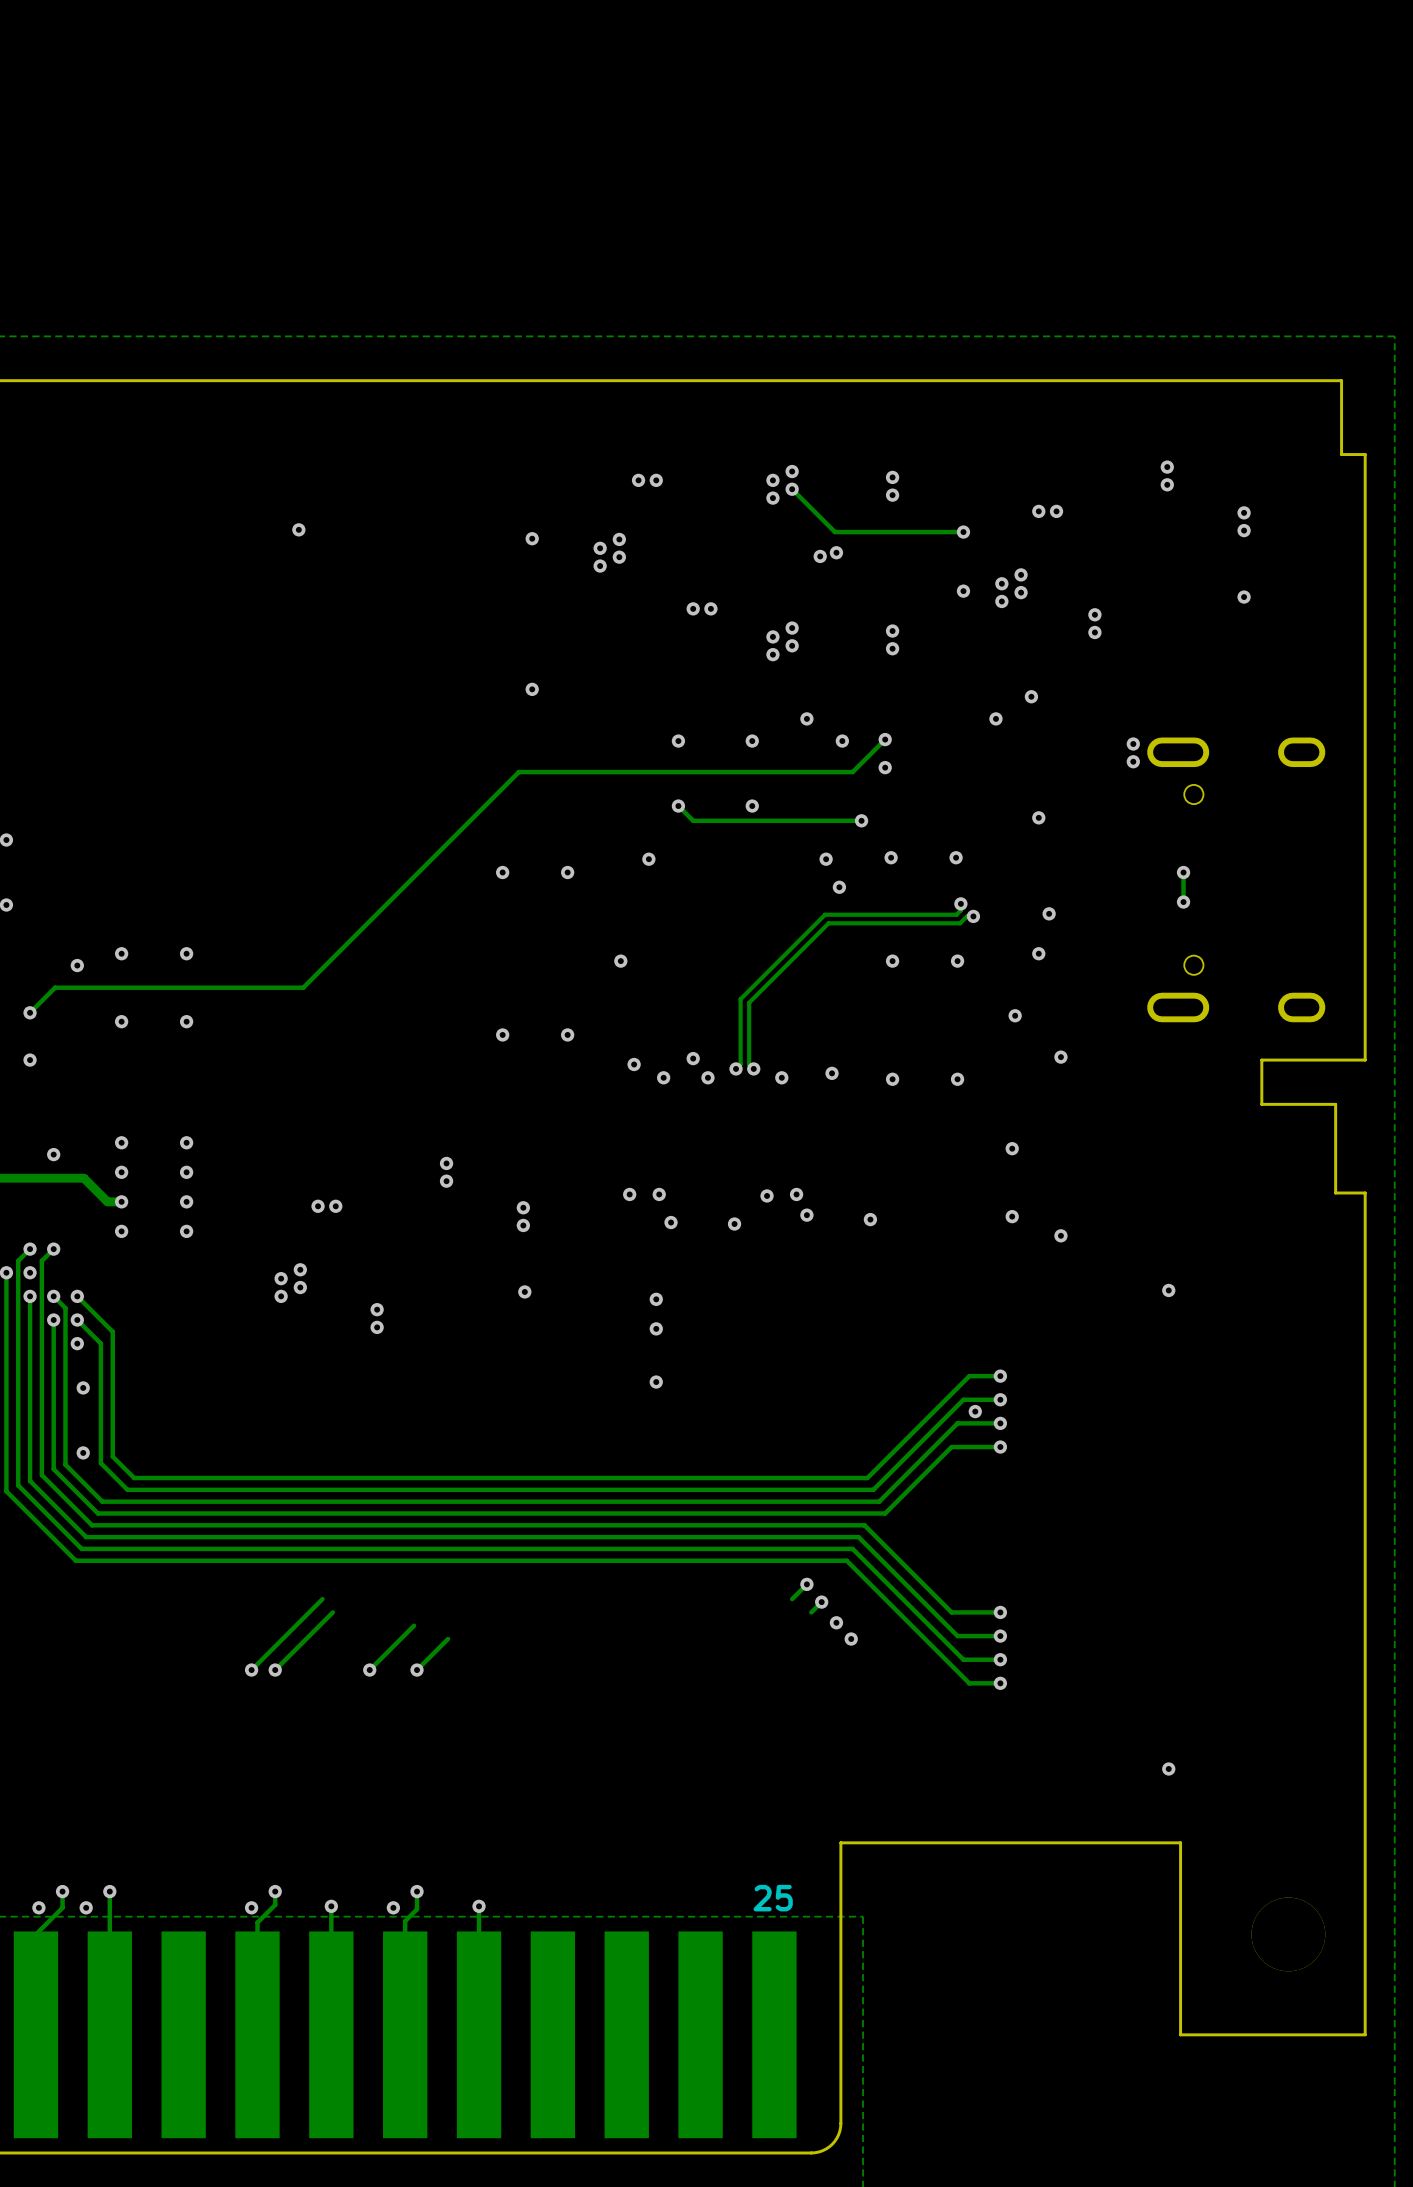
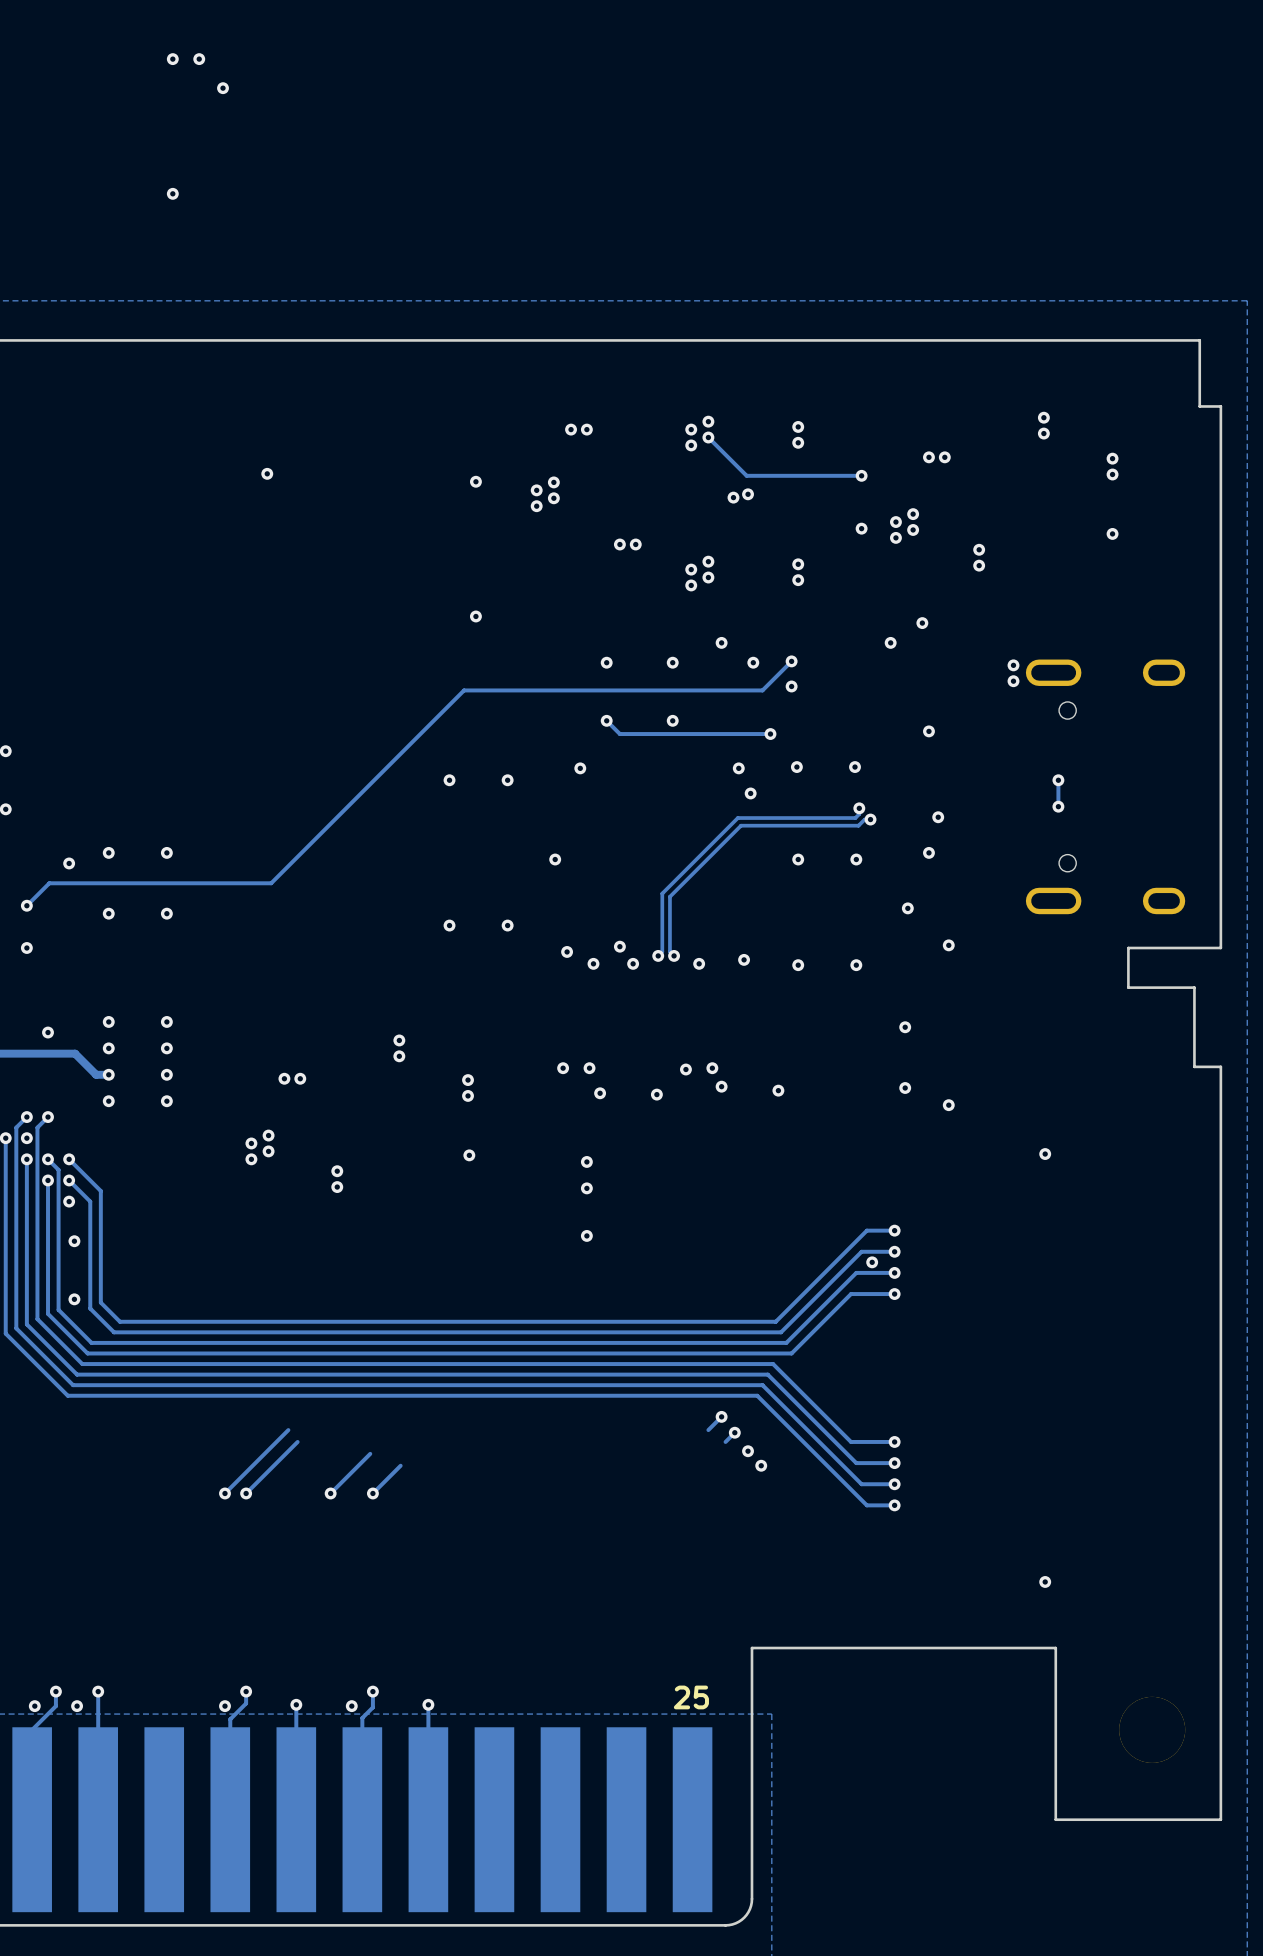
via: none -> (172, 59)
via: none -> (199, 59)
via: none -> (223, 88)
via: none -> (172, 193)

